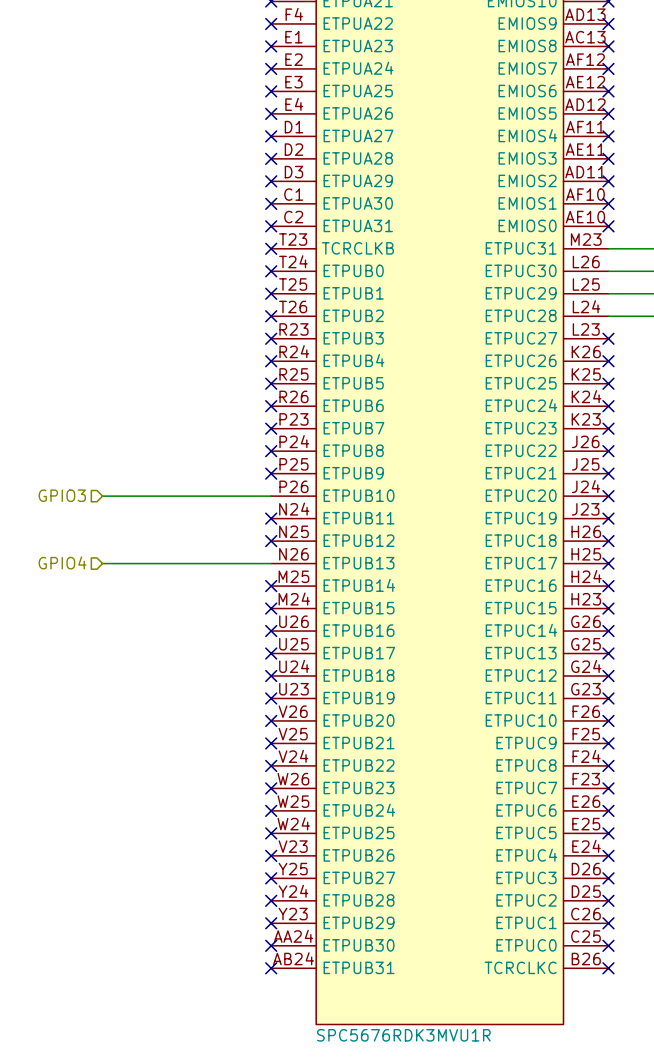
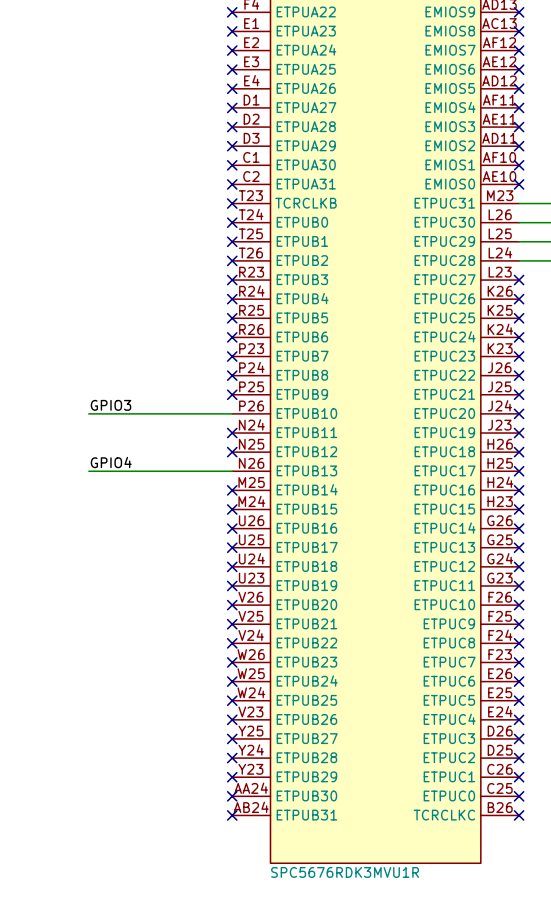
label: none -> GPIO3 (110, 405)
hierarchical label: GPIO3 (62, 495) -> none
label: none -> GPIO4 (111, 462)
hierarchical label: GPIO4 (62, 562) -> none

